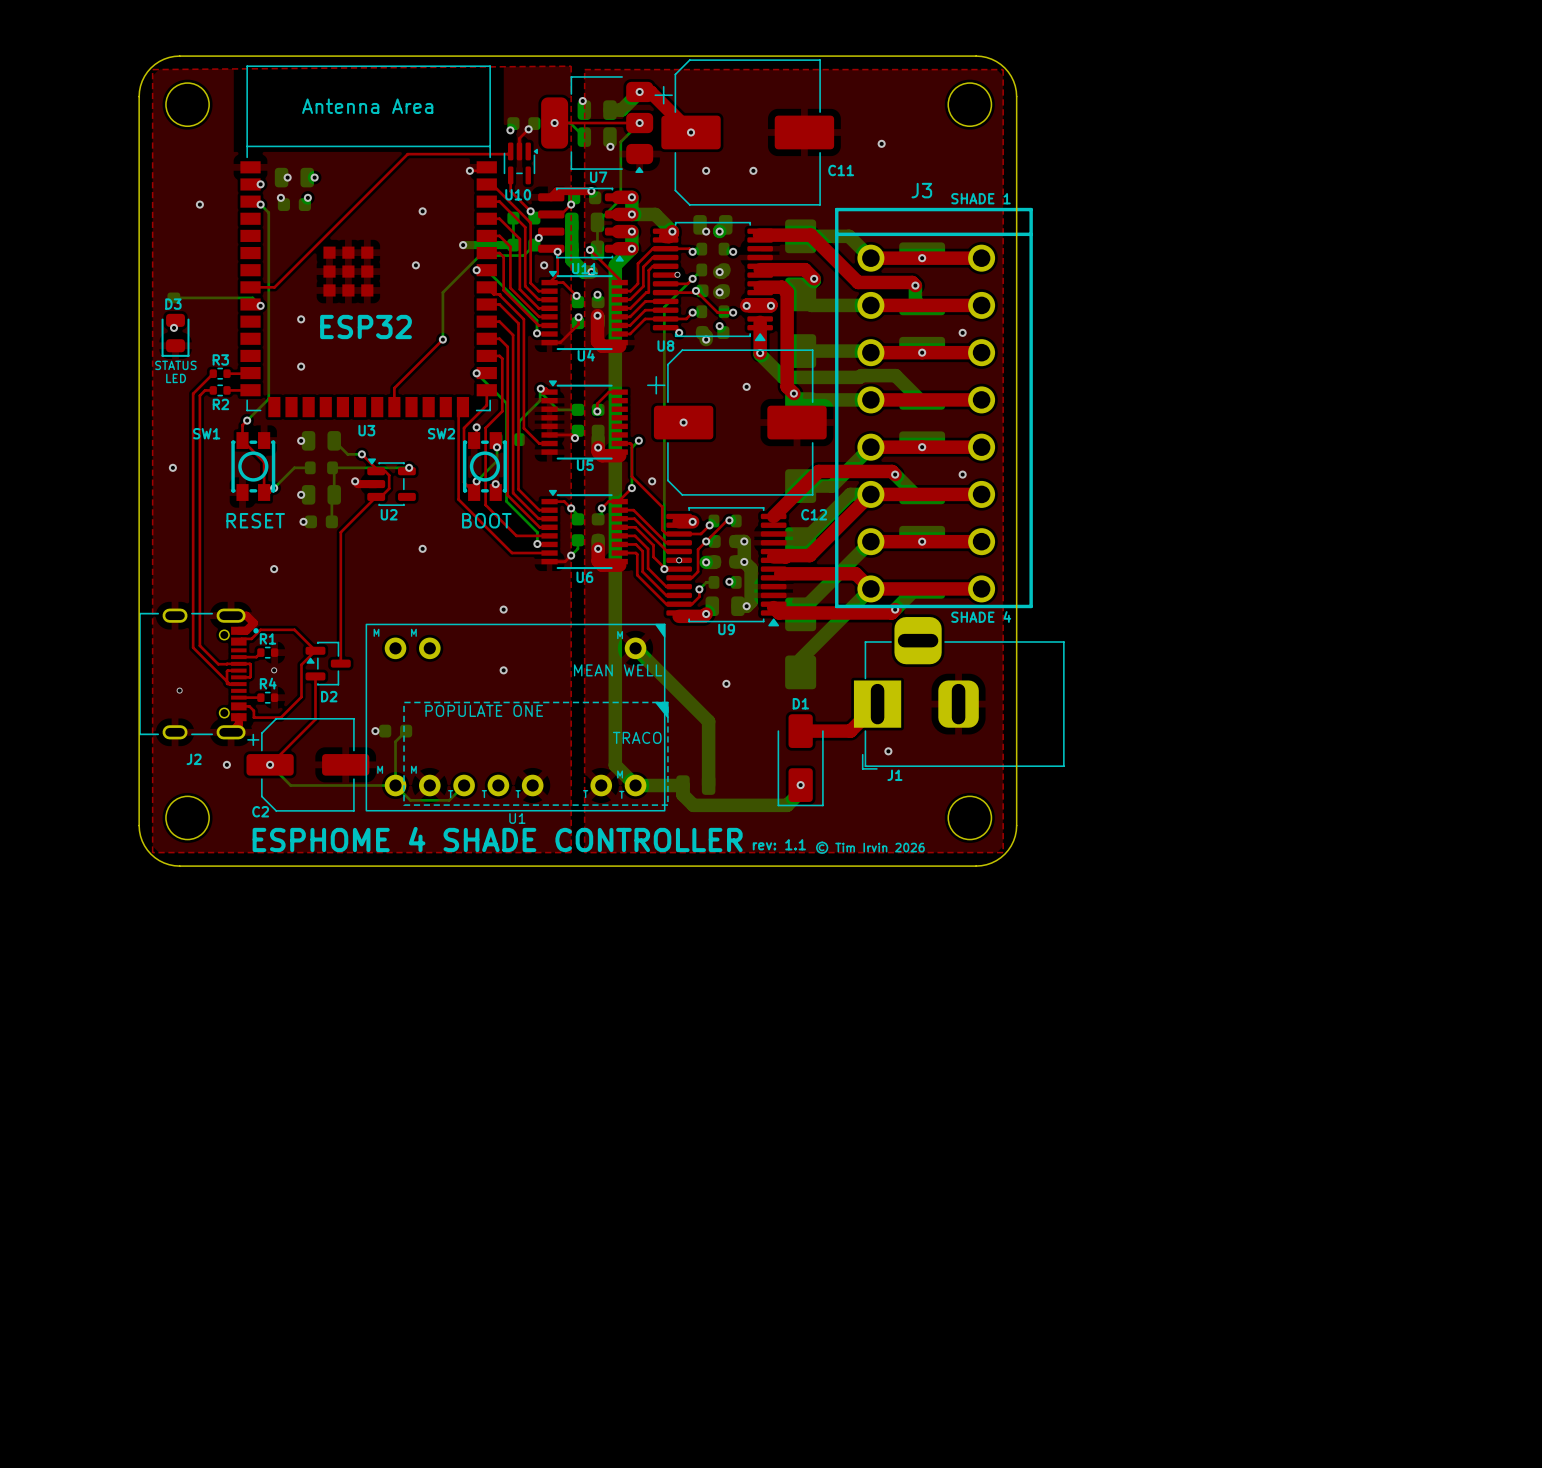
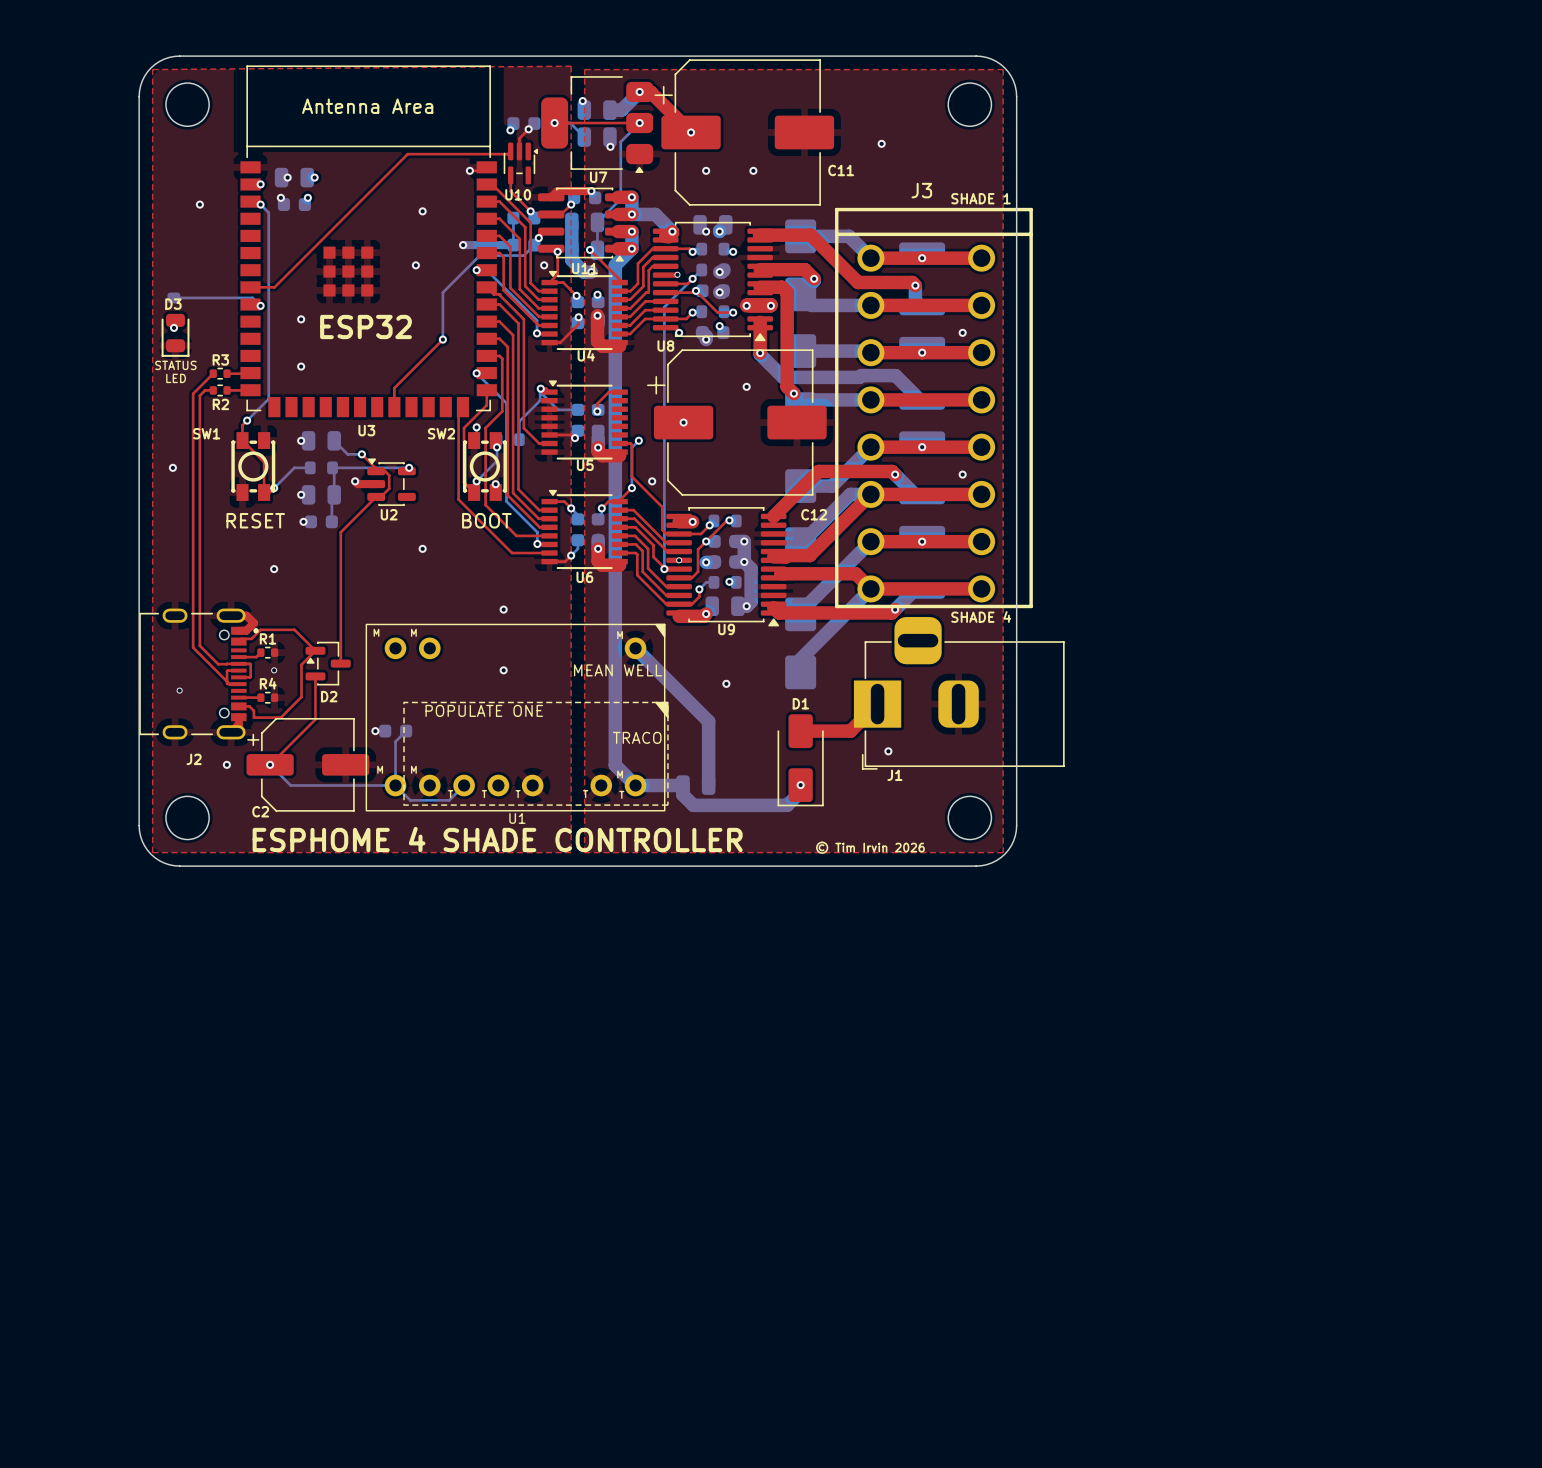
text: rev: 1.1 (779, 844) -> none

